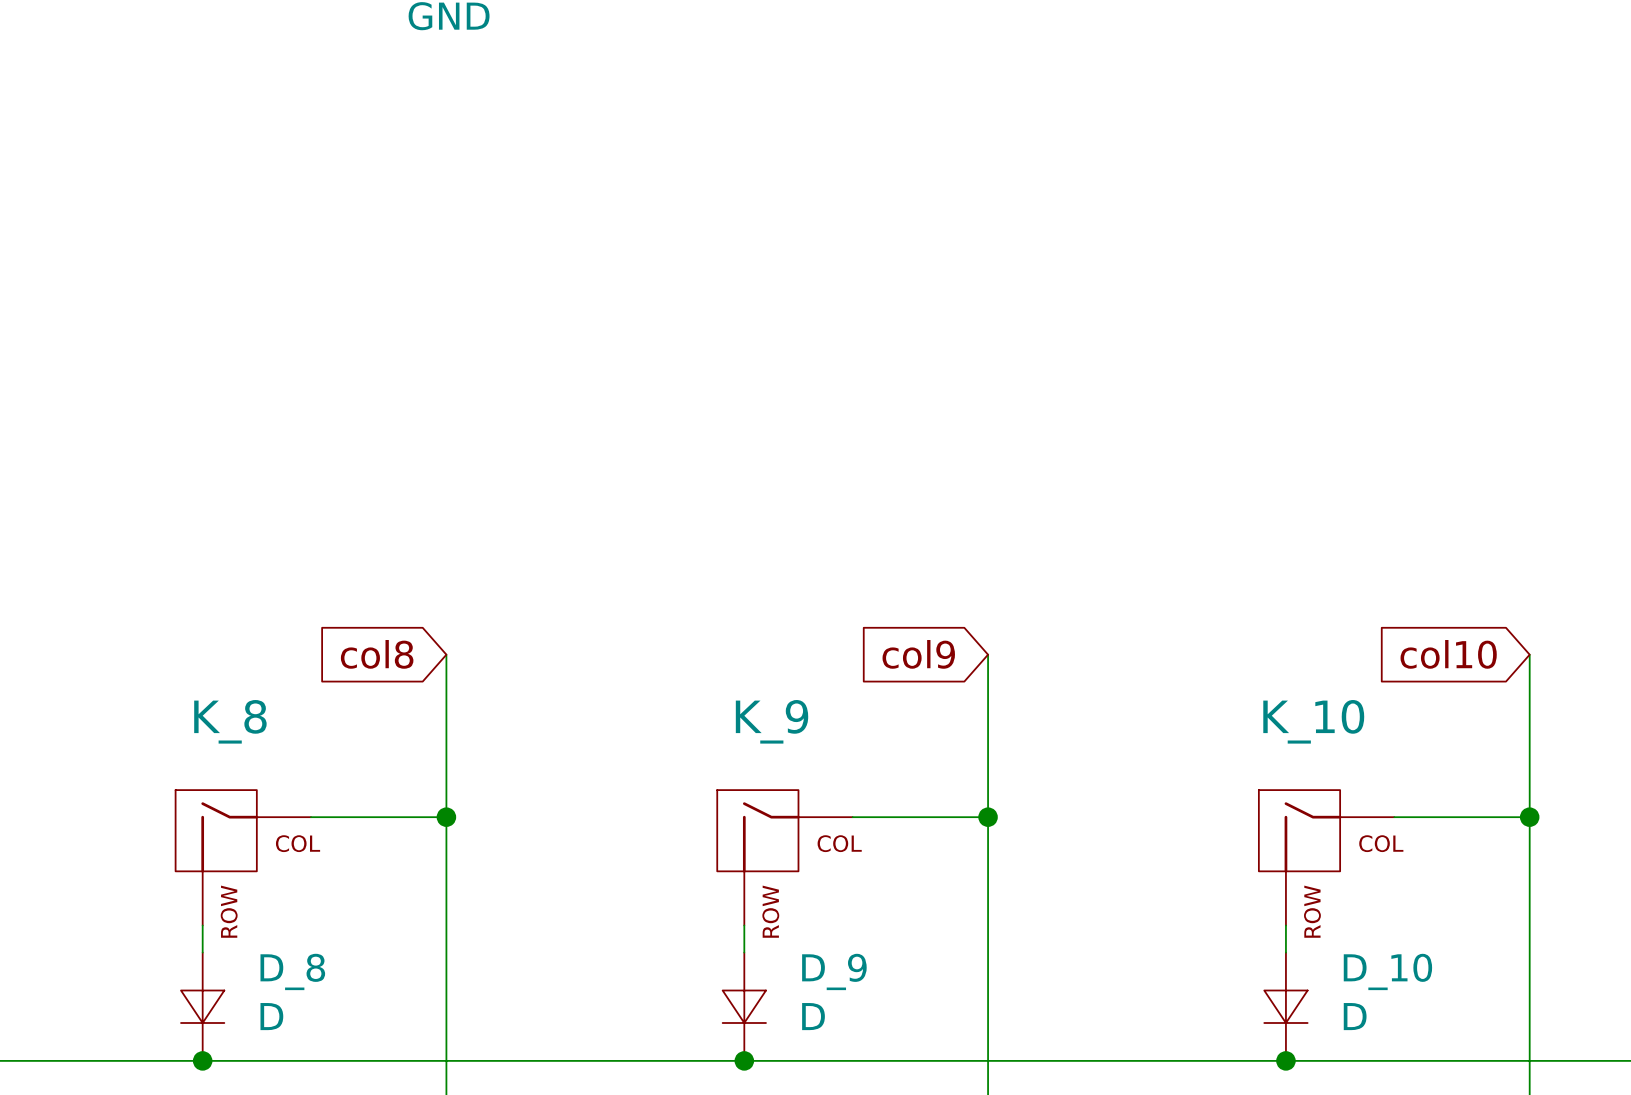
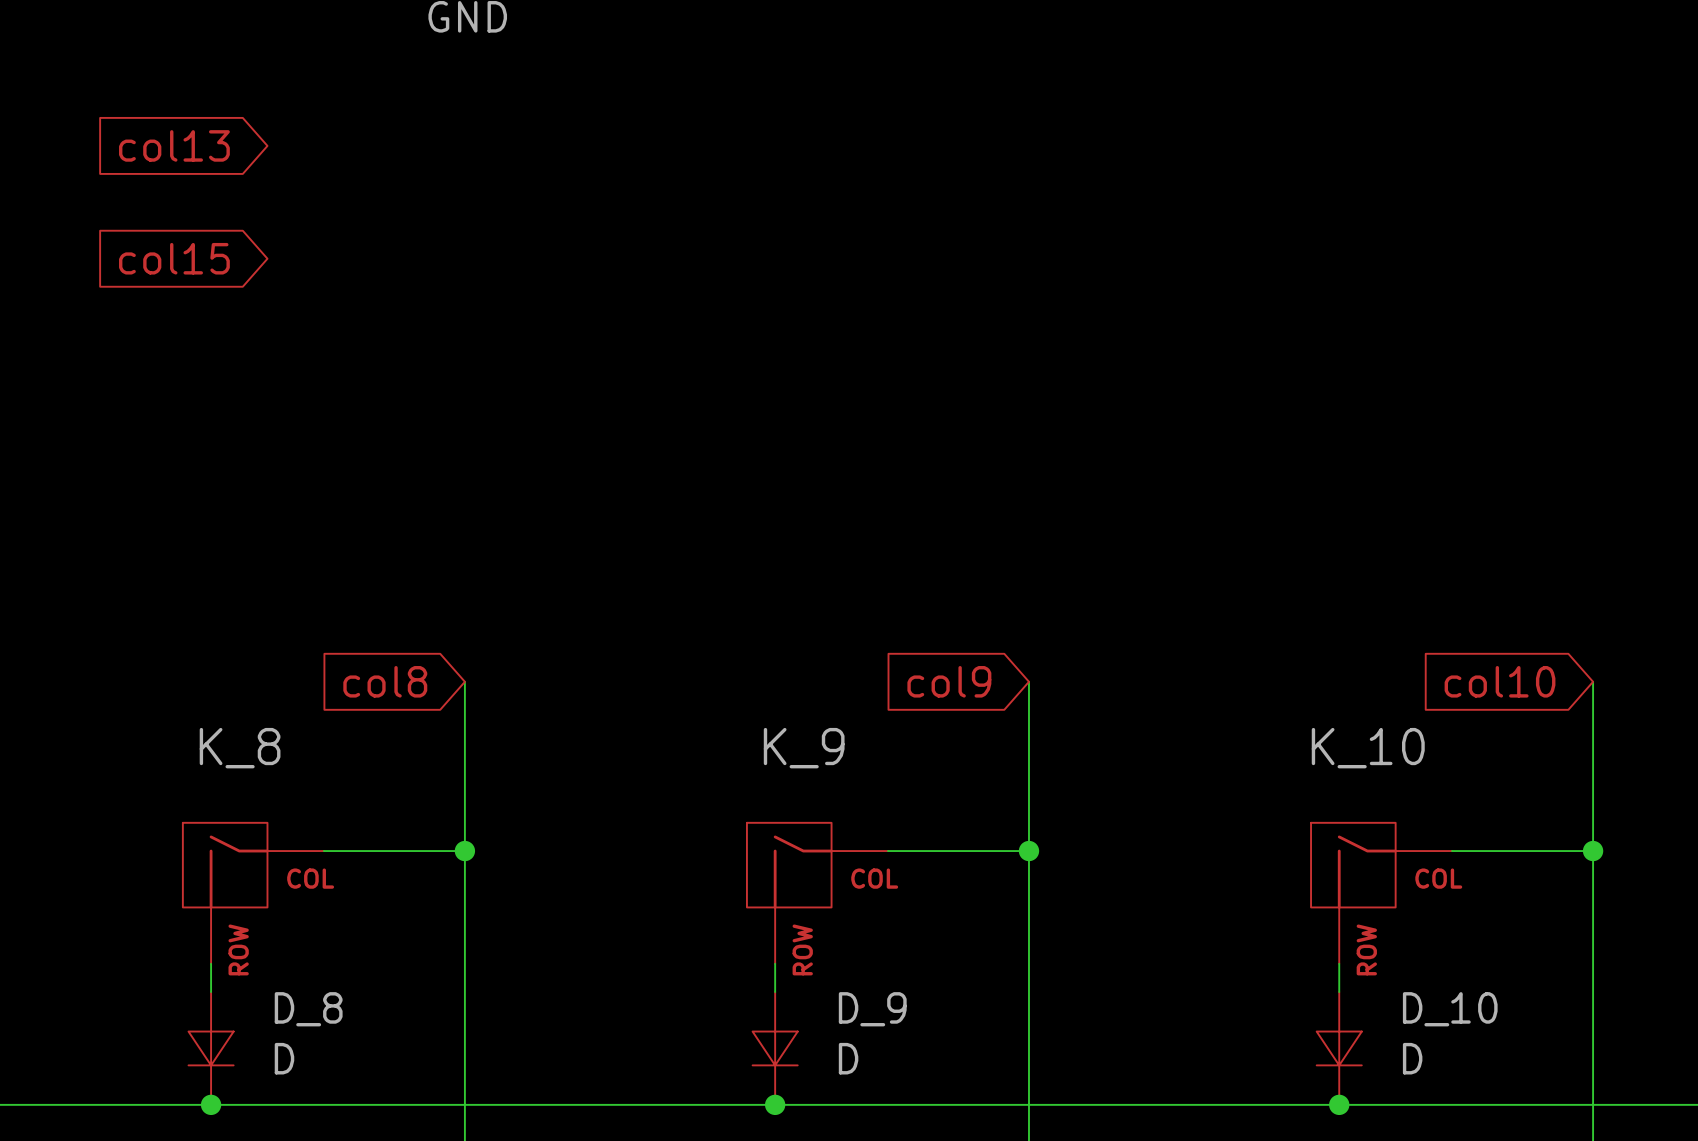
global label: none -> col13 (174, 145)
global label: none -> col15 (174, 258)

